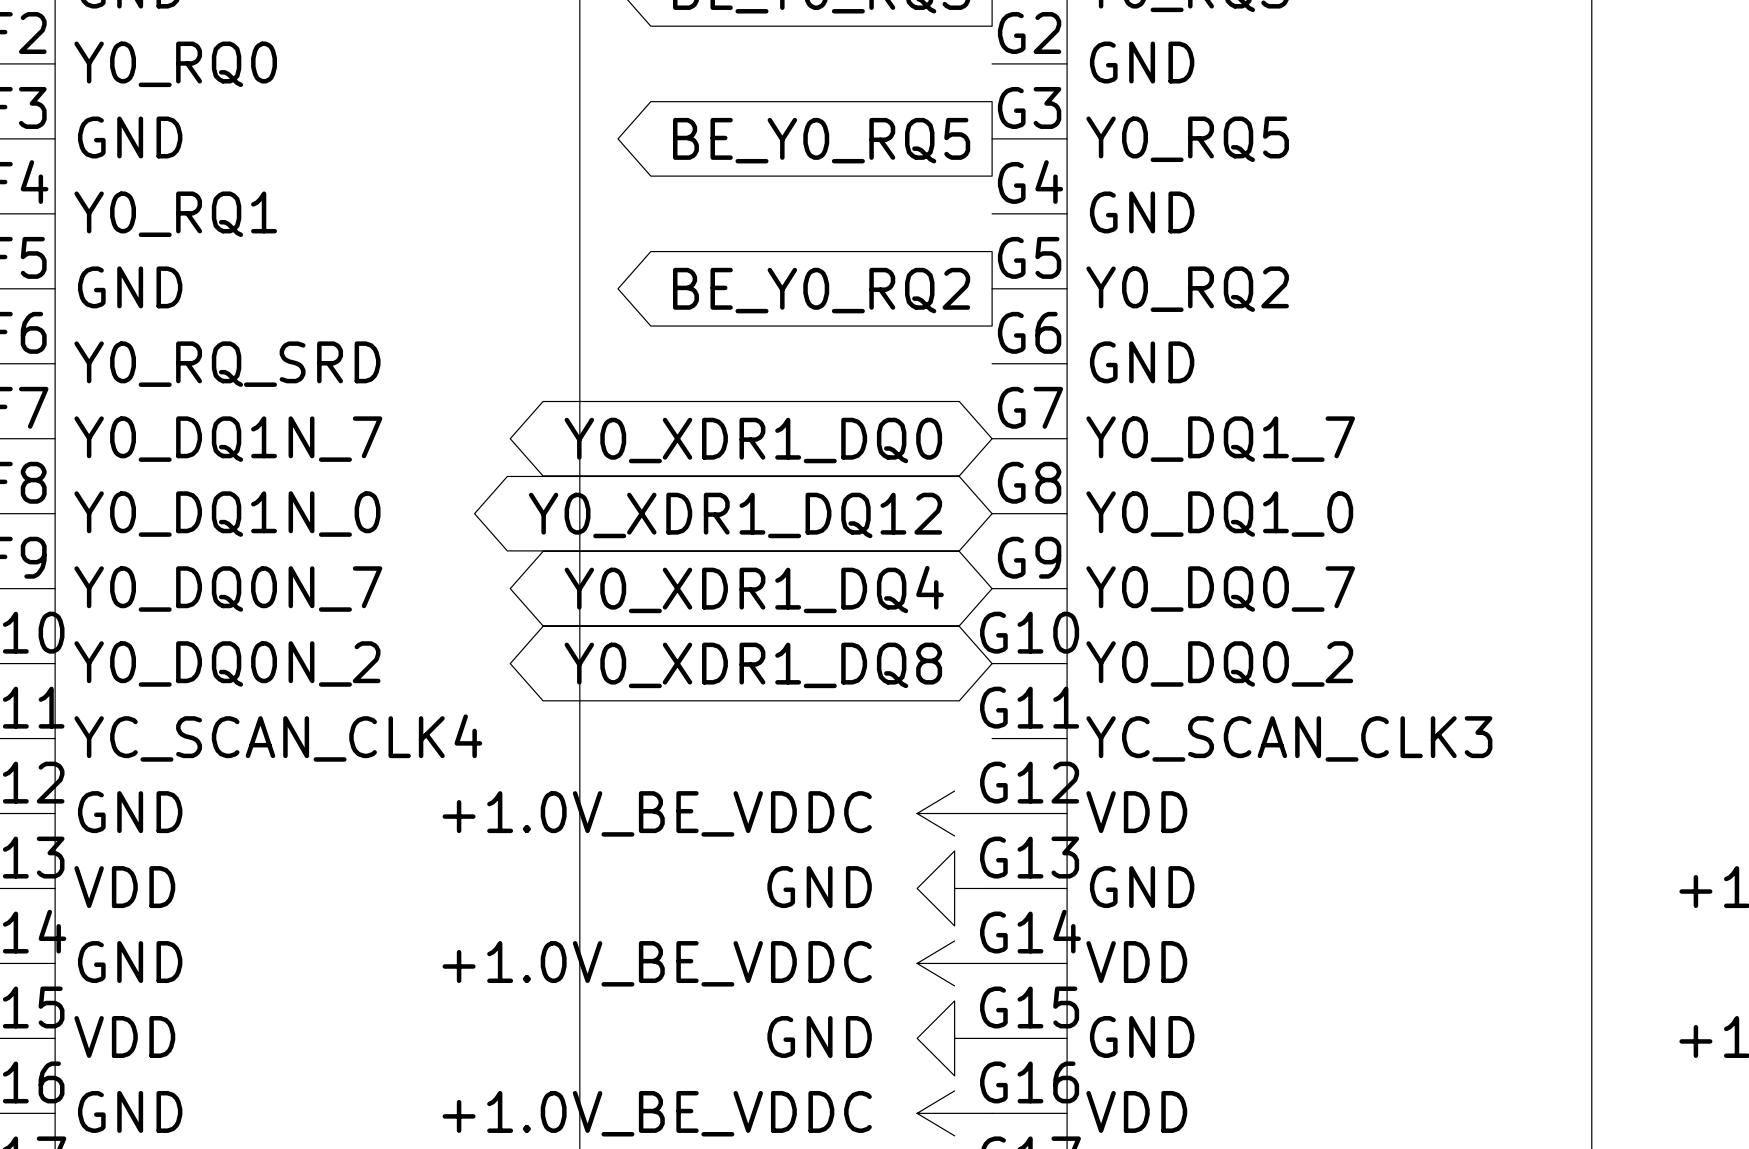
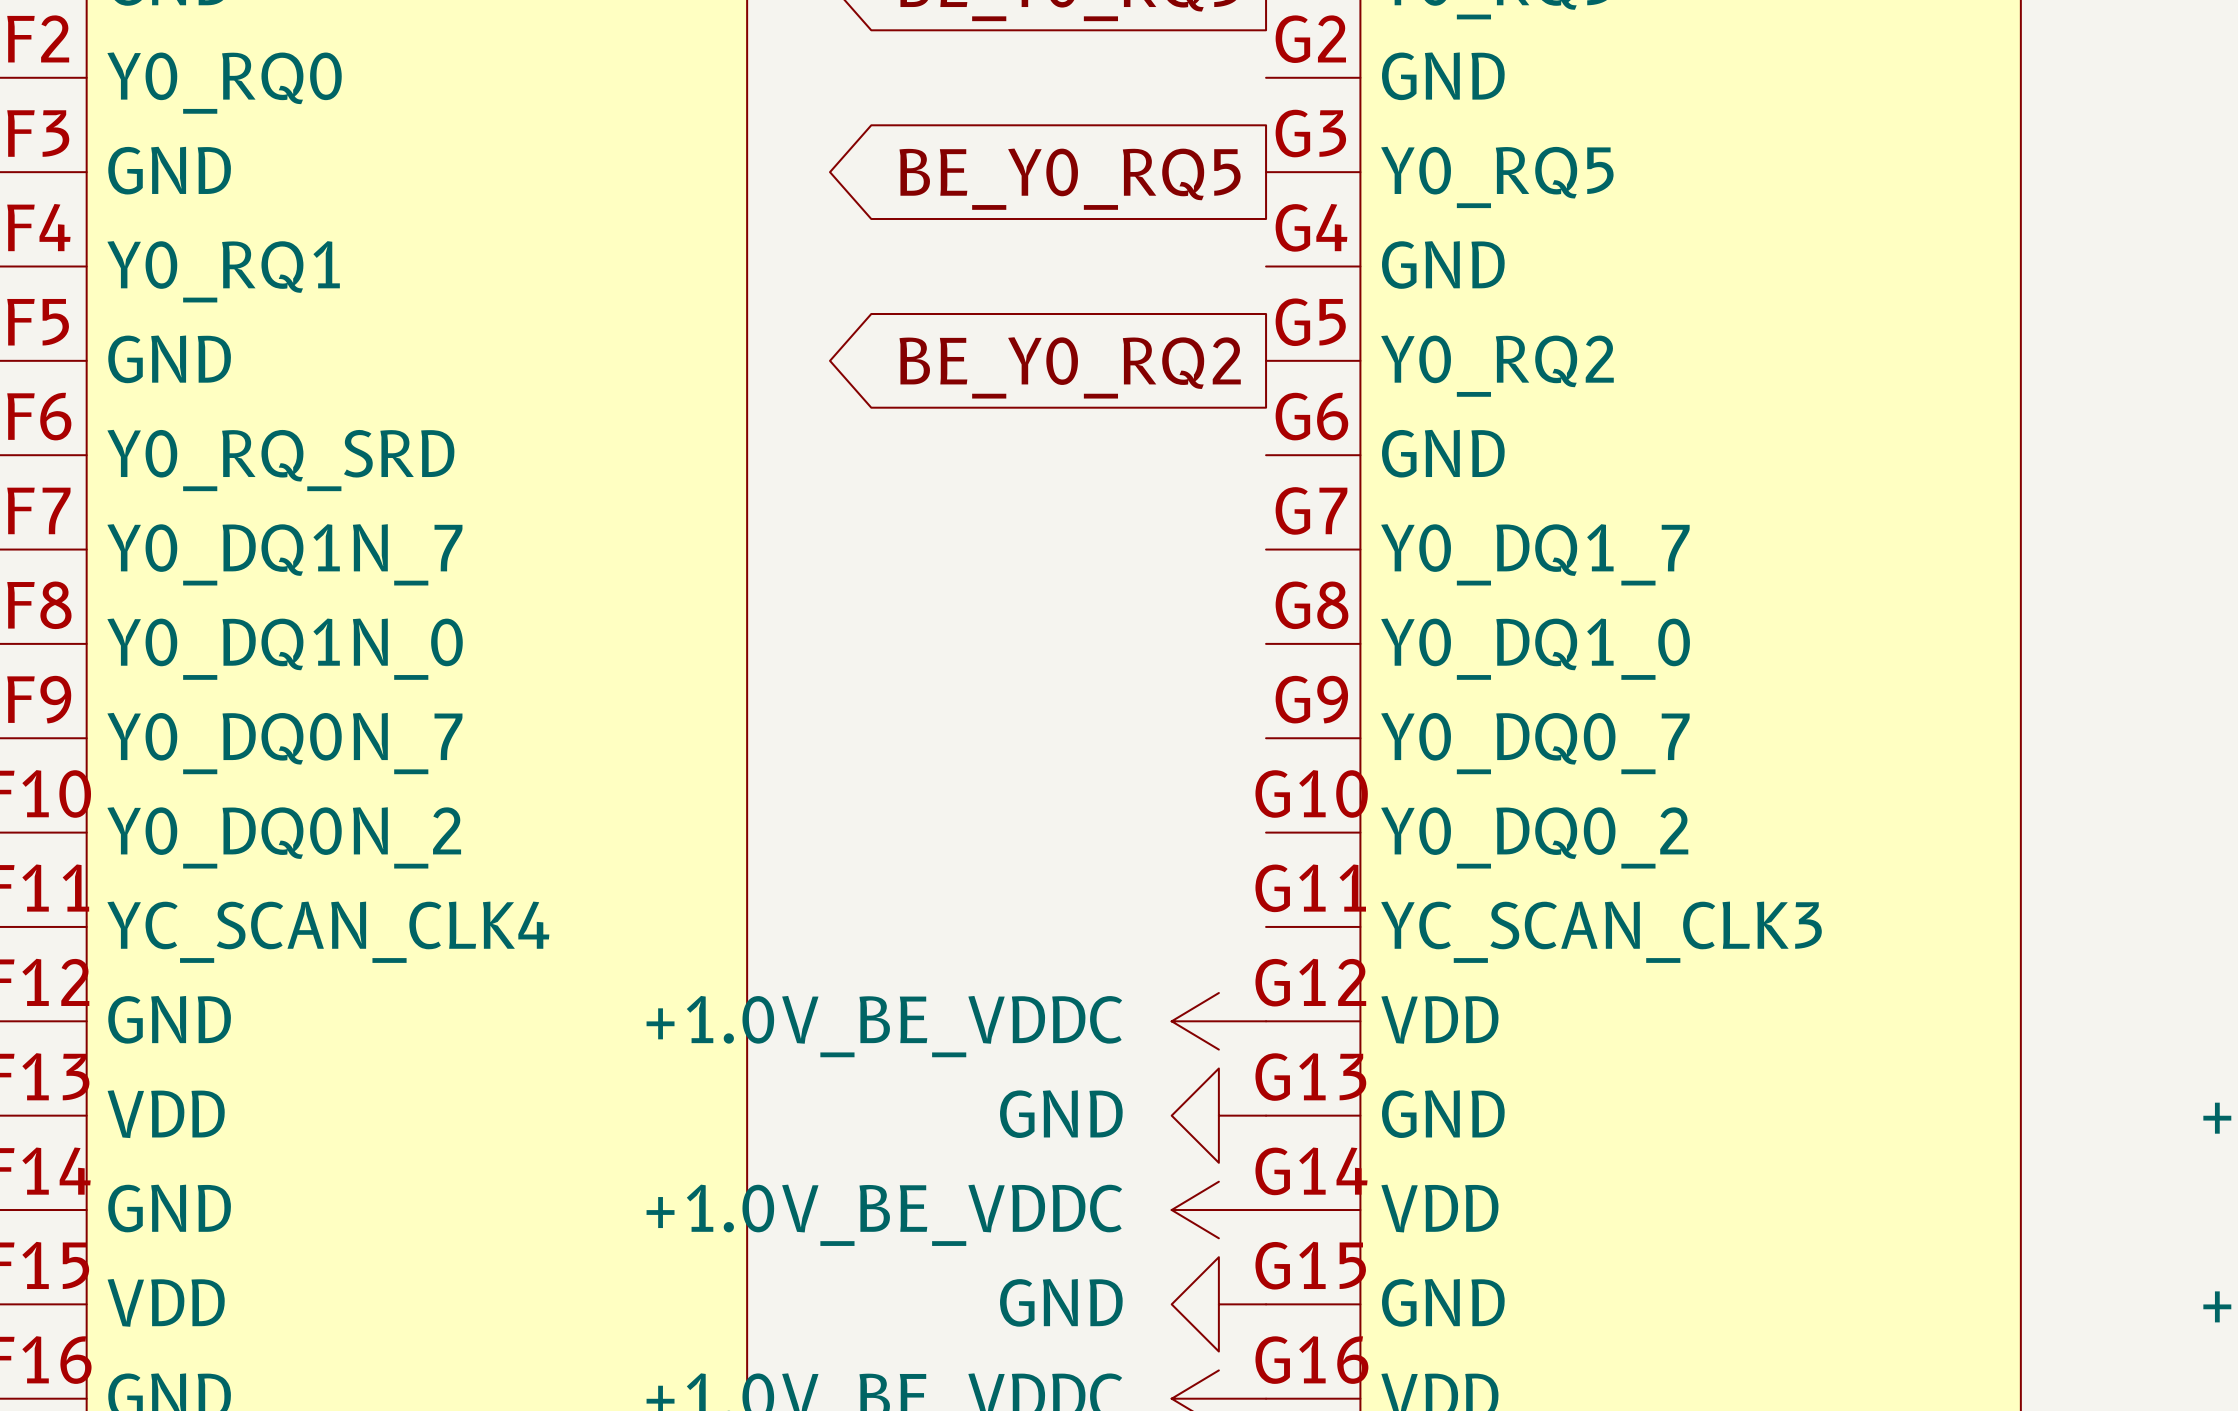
global label: Y0_XDR1_DQ0 (753, 440) -> none
global label: Y0_XDR1_DQ12 (735, 515) -> none
global label: Y0_XDR1_DQ4 (754, 589) -> none
global label: Y0_XDR1_DQ8 (753, 665) -> none

